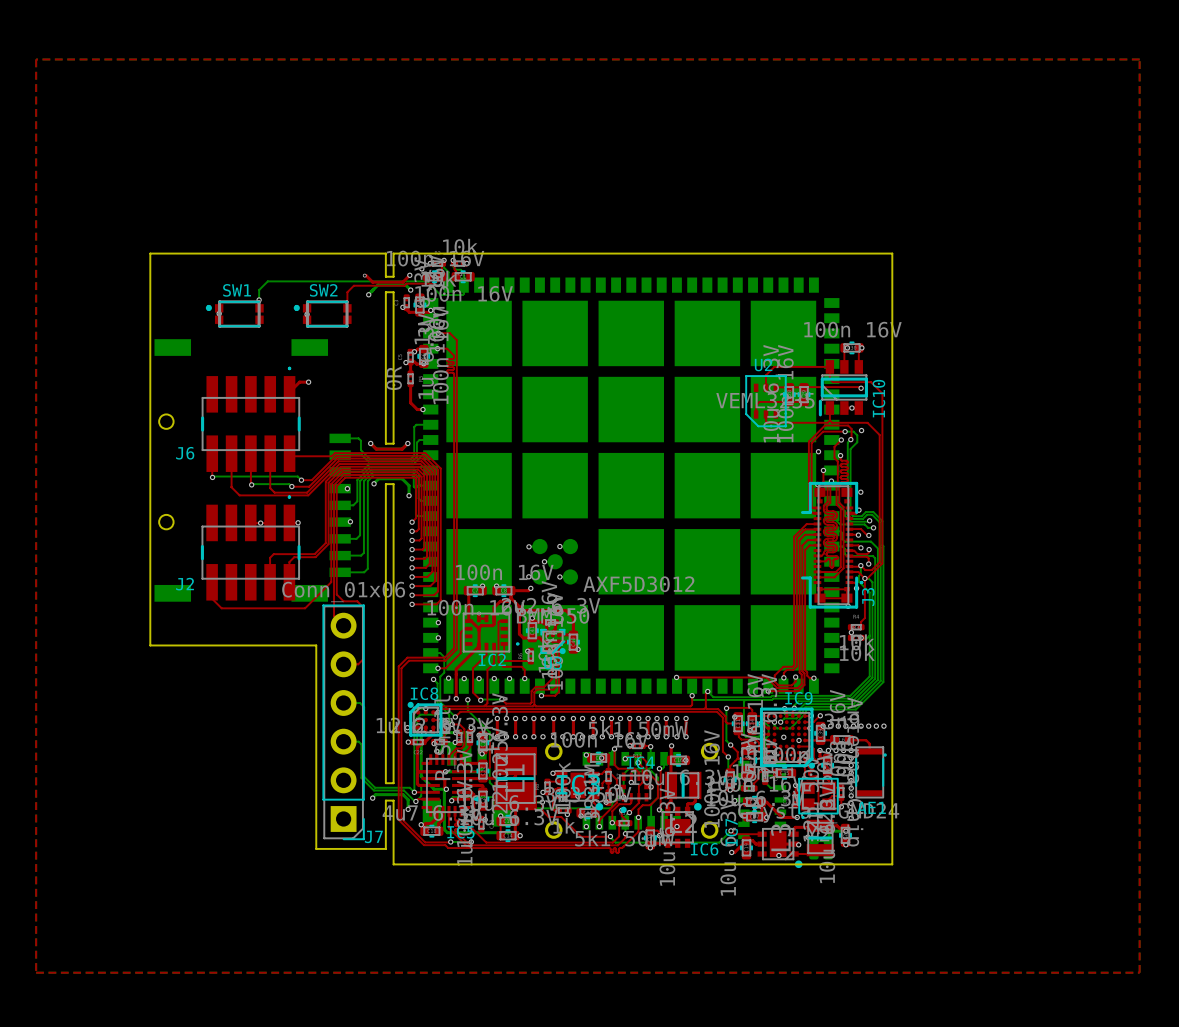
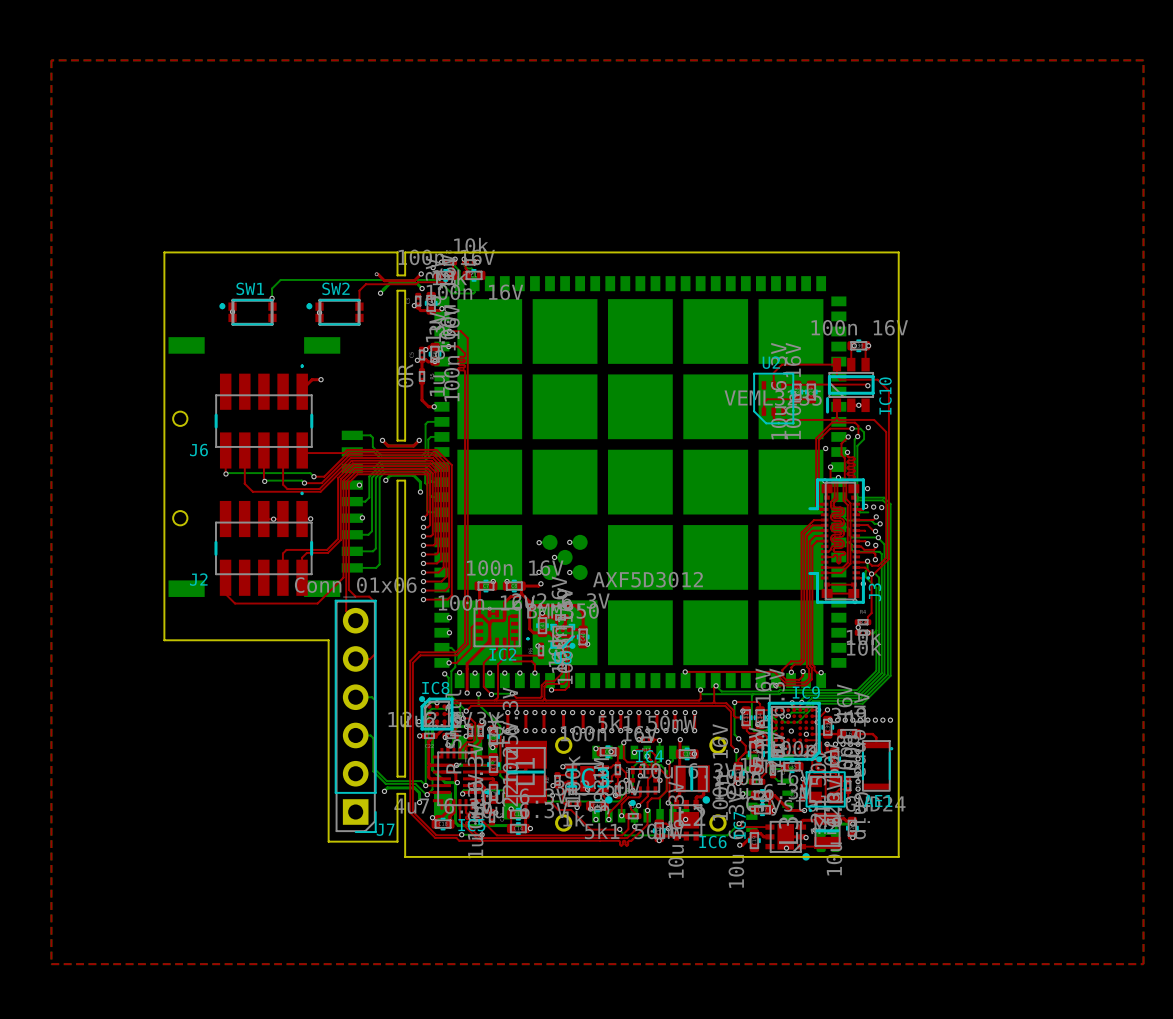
bottom track: (834, 500) (845, 511) (845, 515) (851, 521) (869, 520) -> none
bottom track: (847, 501) (847, 514) (852, 518) (862, 518) (867, 514) (872, 514) (879, 522) (880, 680) -> (854, 497) (857, 500) (883, 500) (887, 505) (887, 675)
via: none -> (873, 507)
via: none -> (881, 507)
bottom track: (861, 516) (865, 512) (873, 512) (882, 521) (883, 682) -> (857, 496) (884, 497) (890, 504) (889, 676)
top track: none -> (874, 519) (856, 520)
via: (858, 535) -> none
via: none -> (878, 537)

